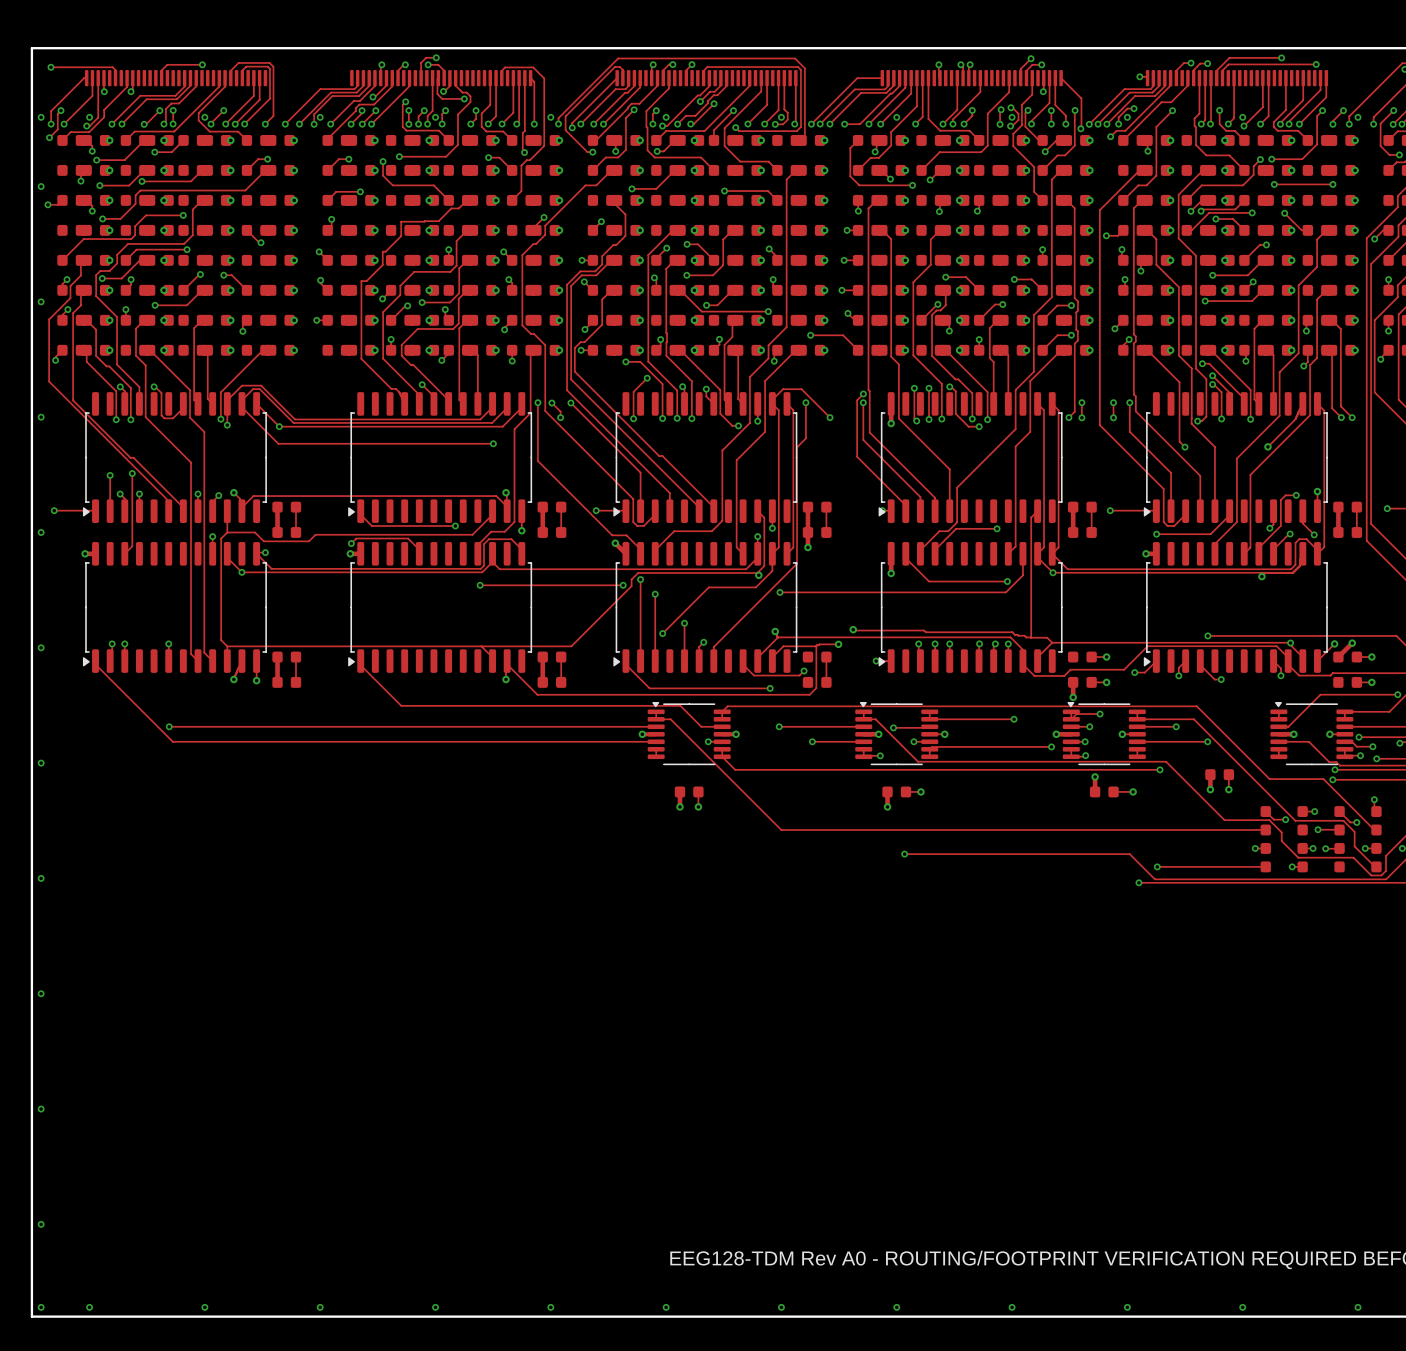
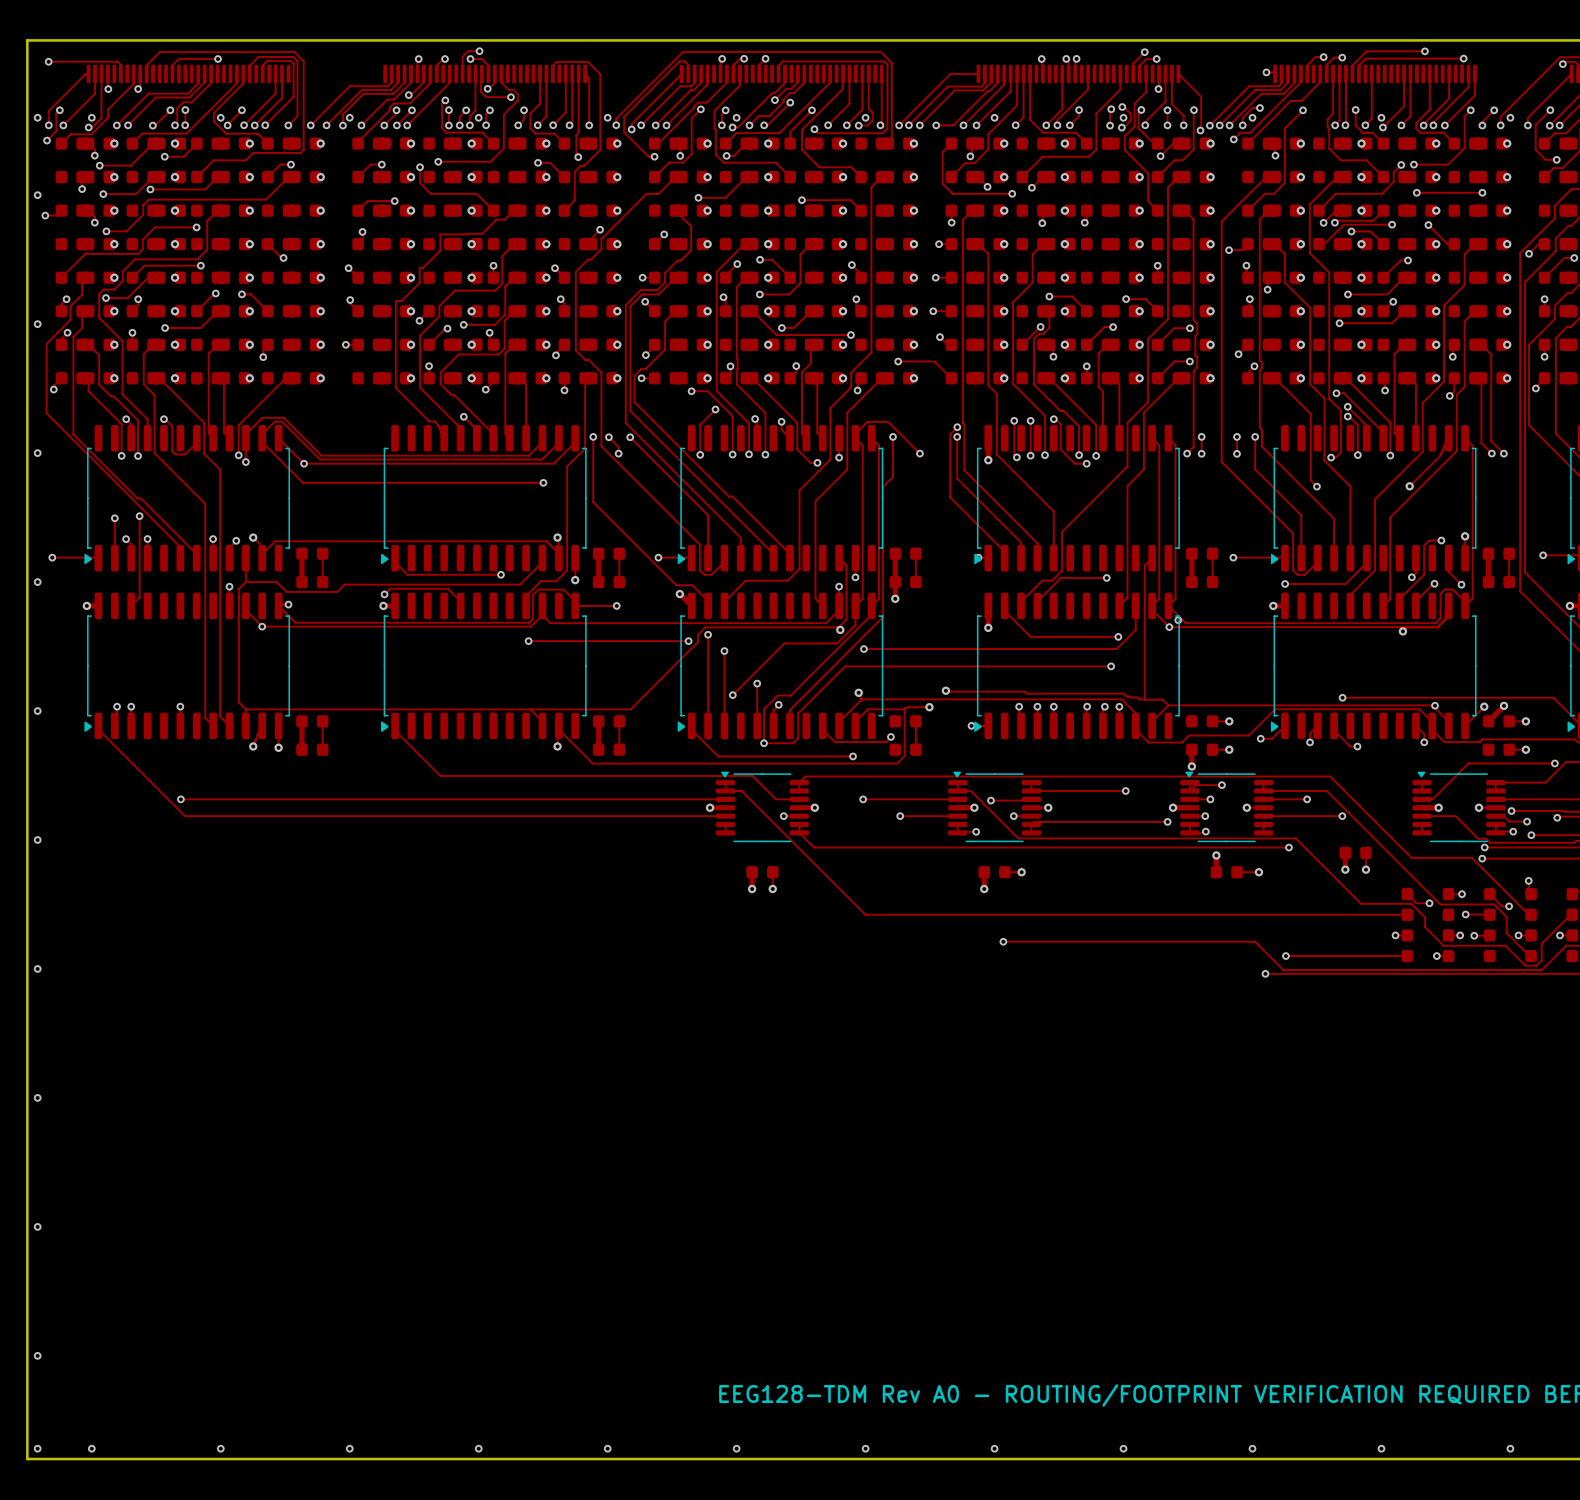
track: none -> (146, 73) (146, 65) (159, 52) (294, 52) (303, 61) (303, 149) (300, 152) (253, 152) (245, 160) (213, 160) (196, 177)
track: none -> (575, 605) (616, 605)
via: none -> (616, 605)
track: none -> (871, 605) (871, 614) (790, 695) (777, 695) (764, 709) (764, 743) (793, 743) (798, 738) (798, 713) (845, 666) (1111, 666)
via: none -> (1178, 620)
via: none -> (1111, 666)
via: none -> (764, 743)

